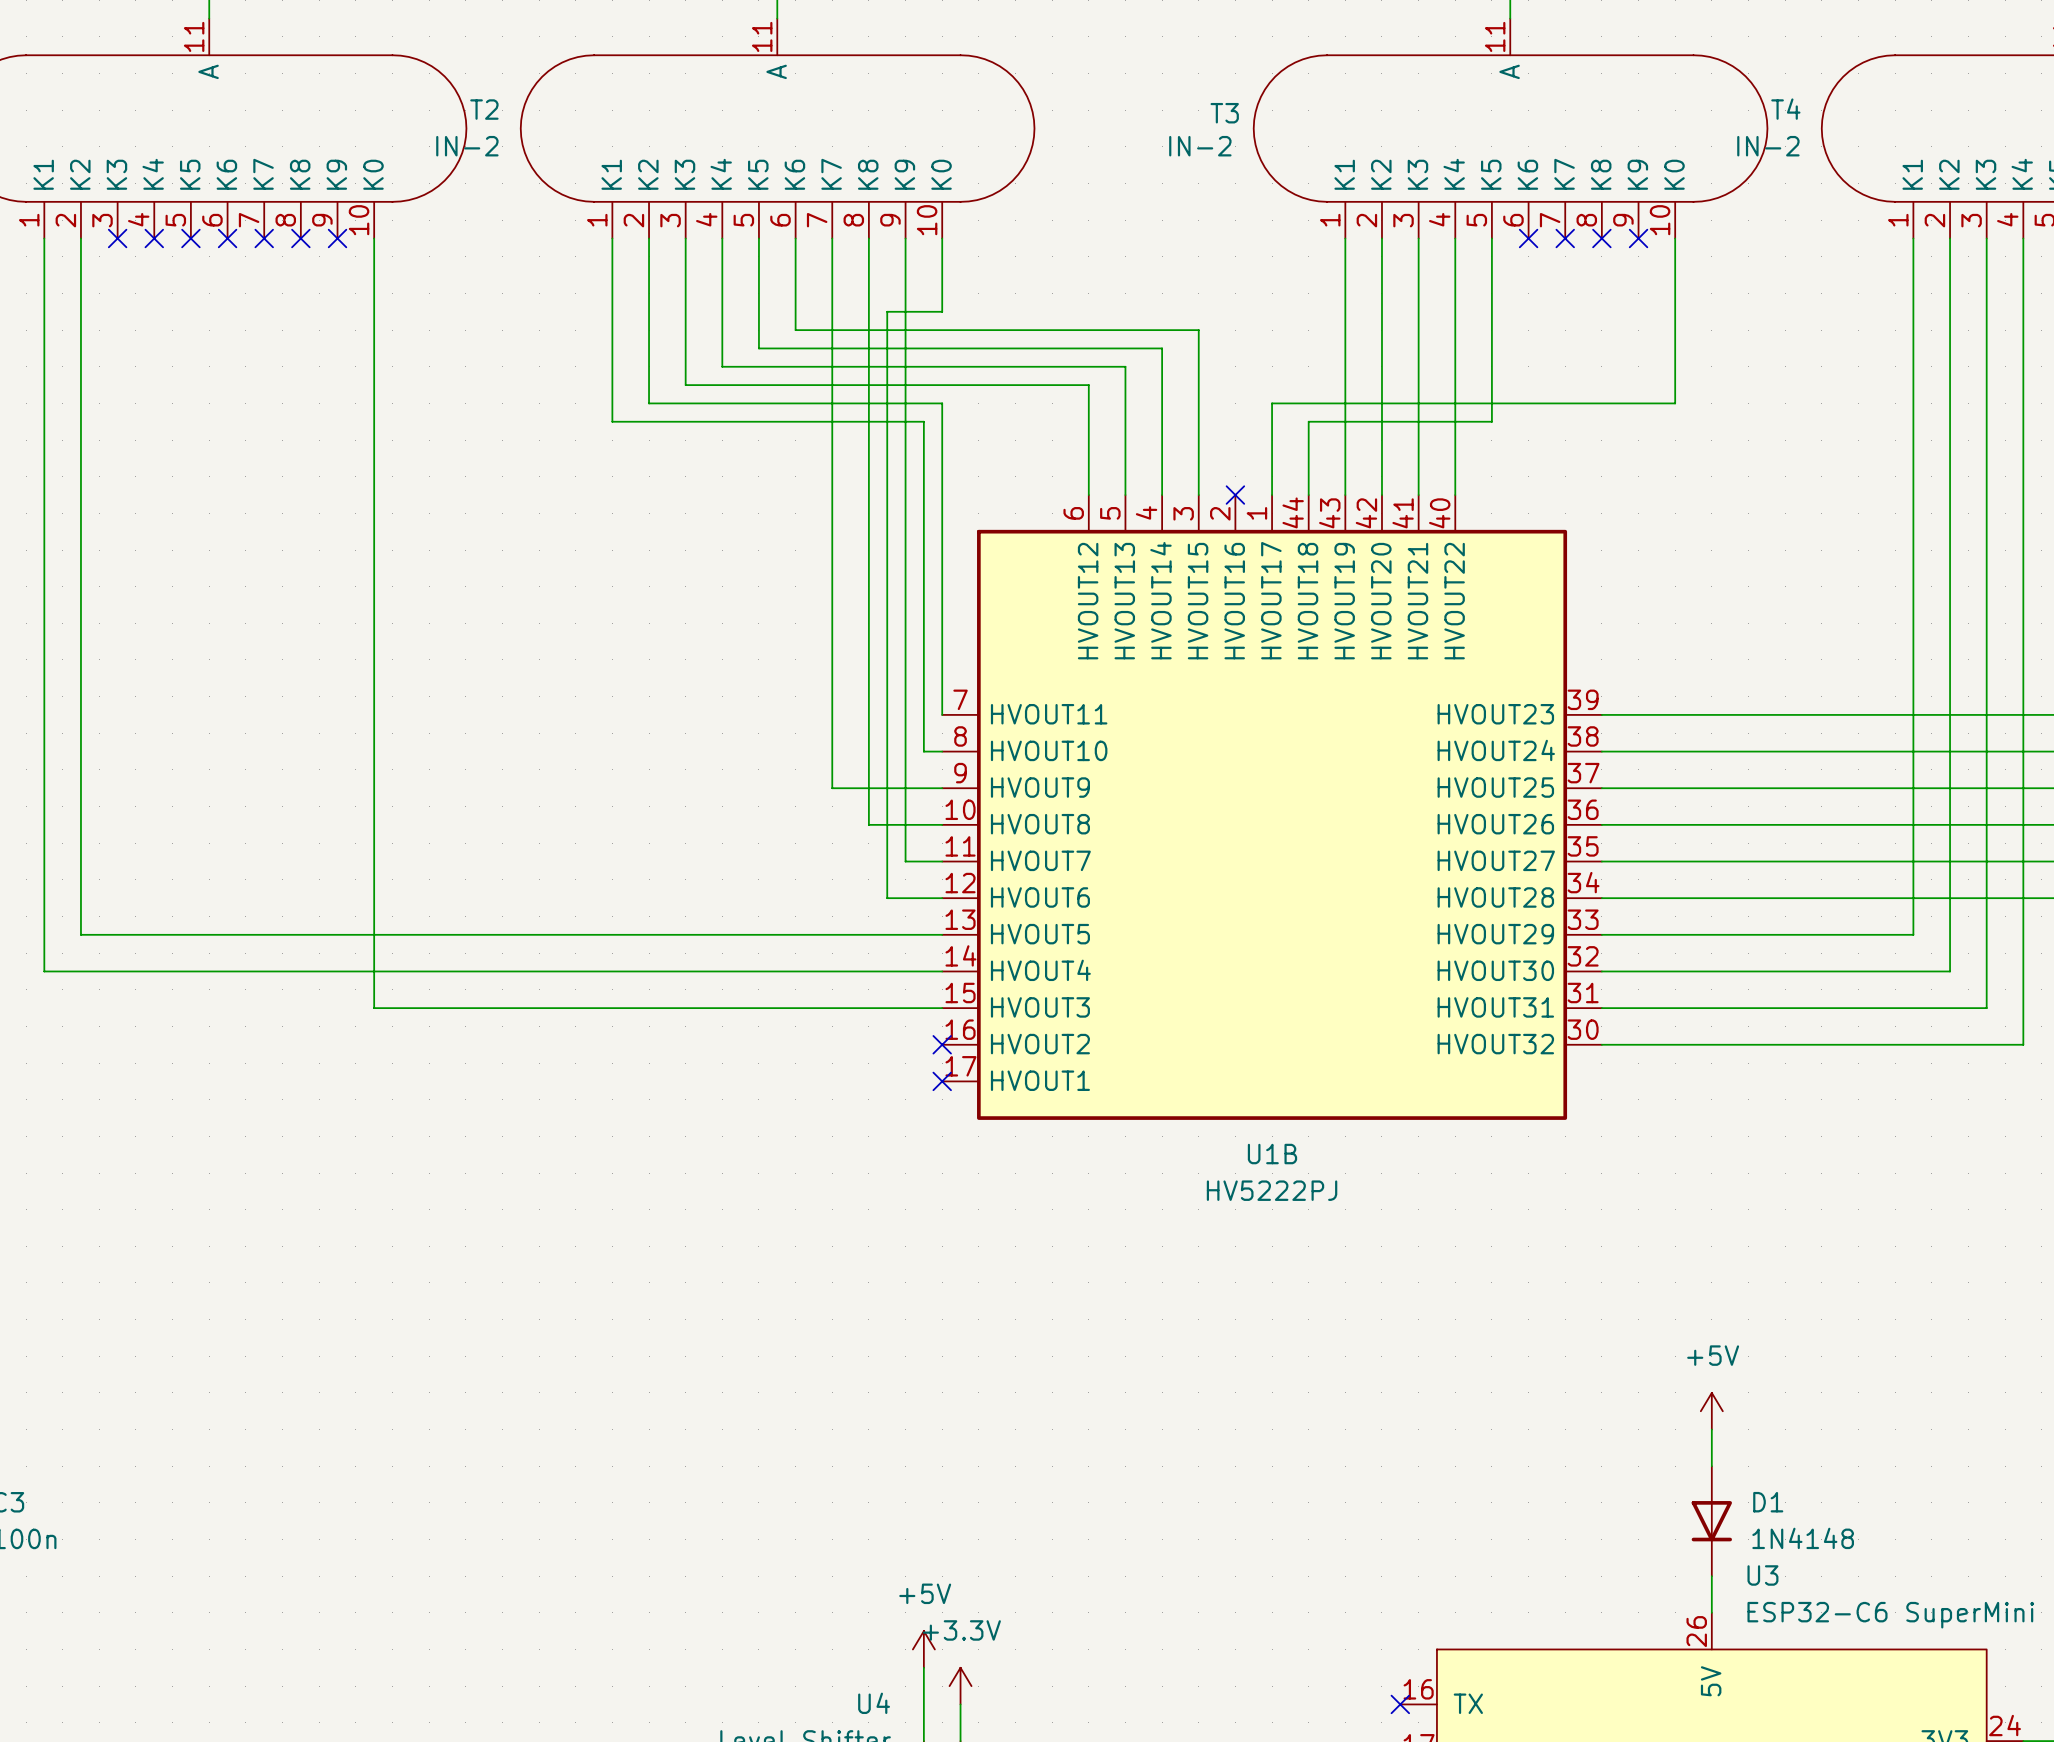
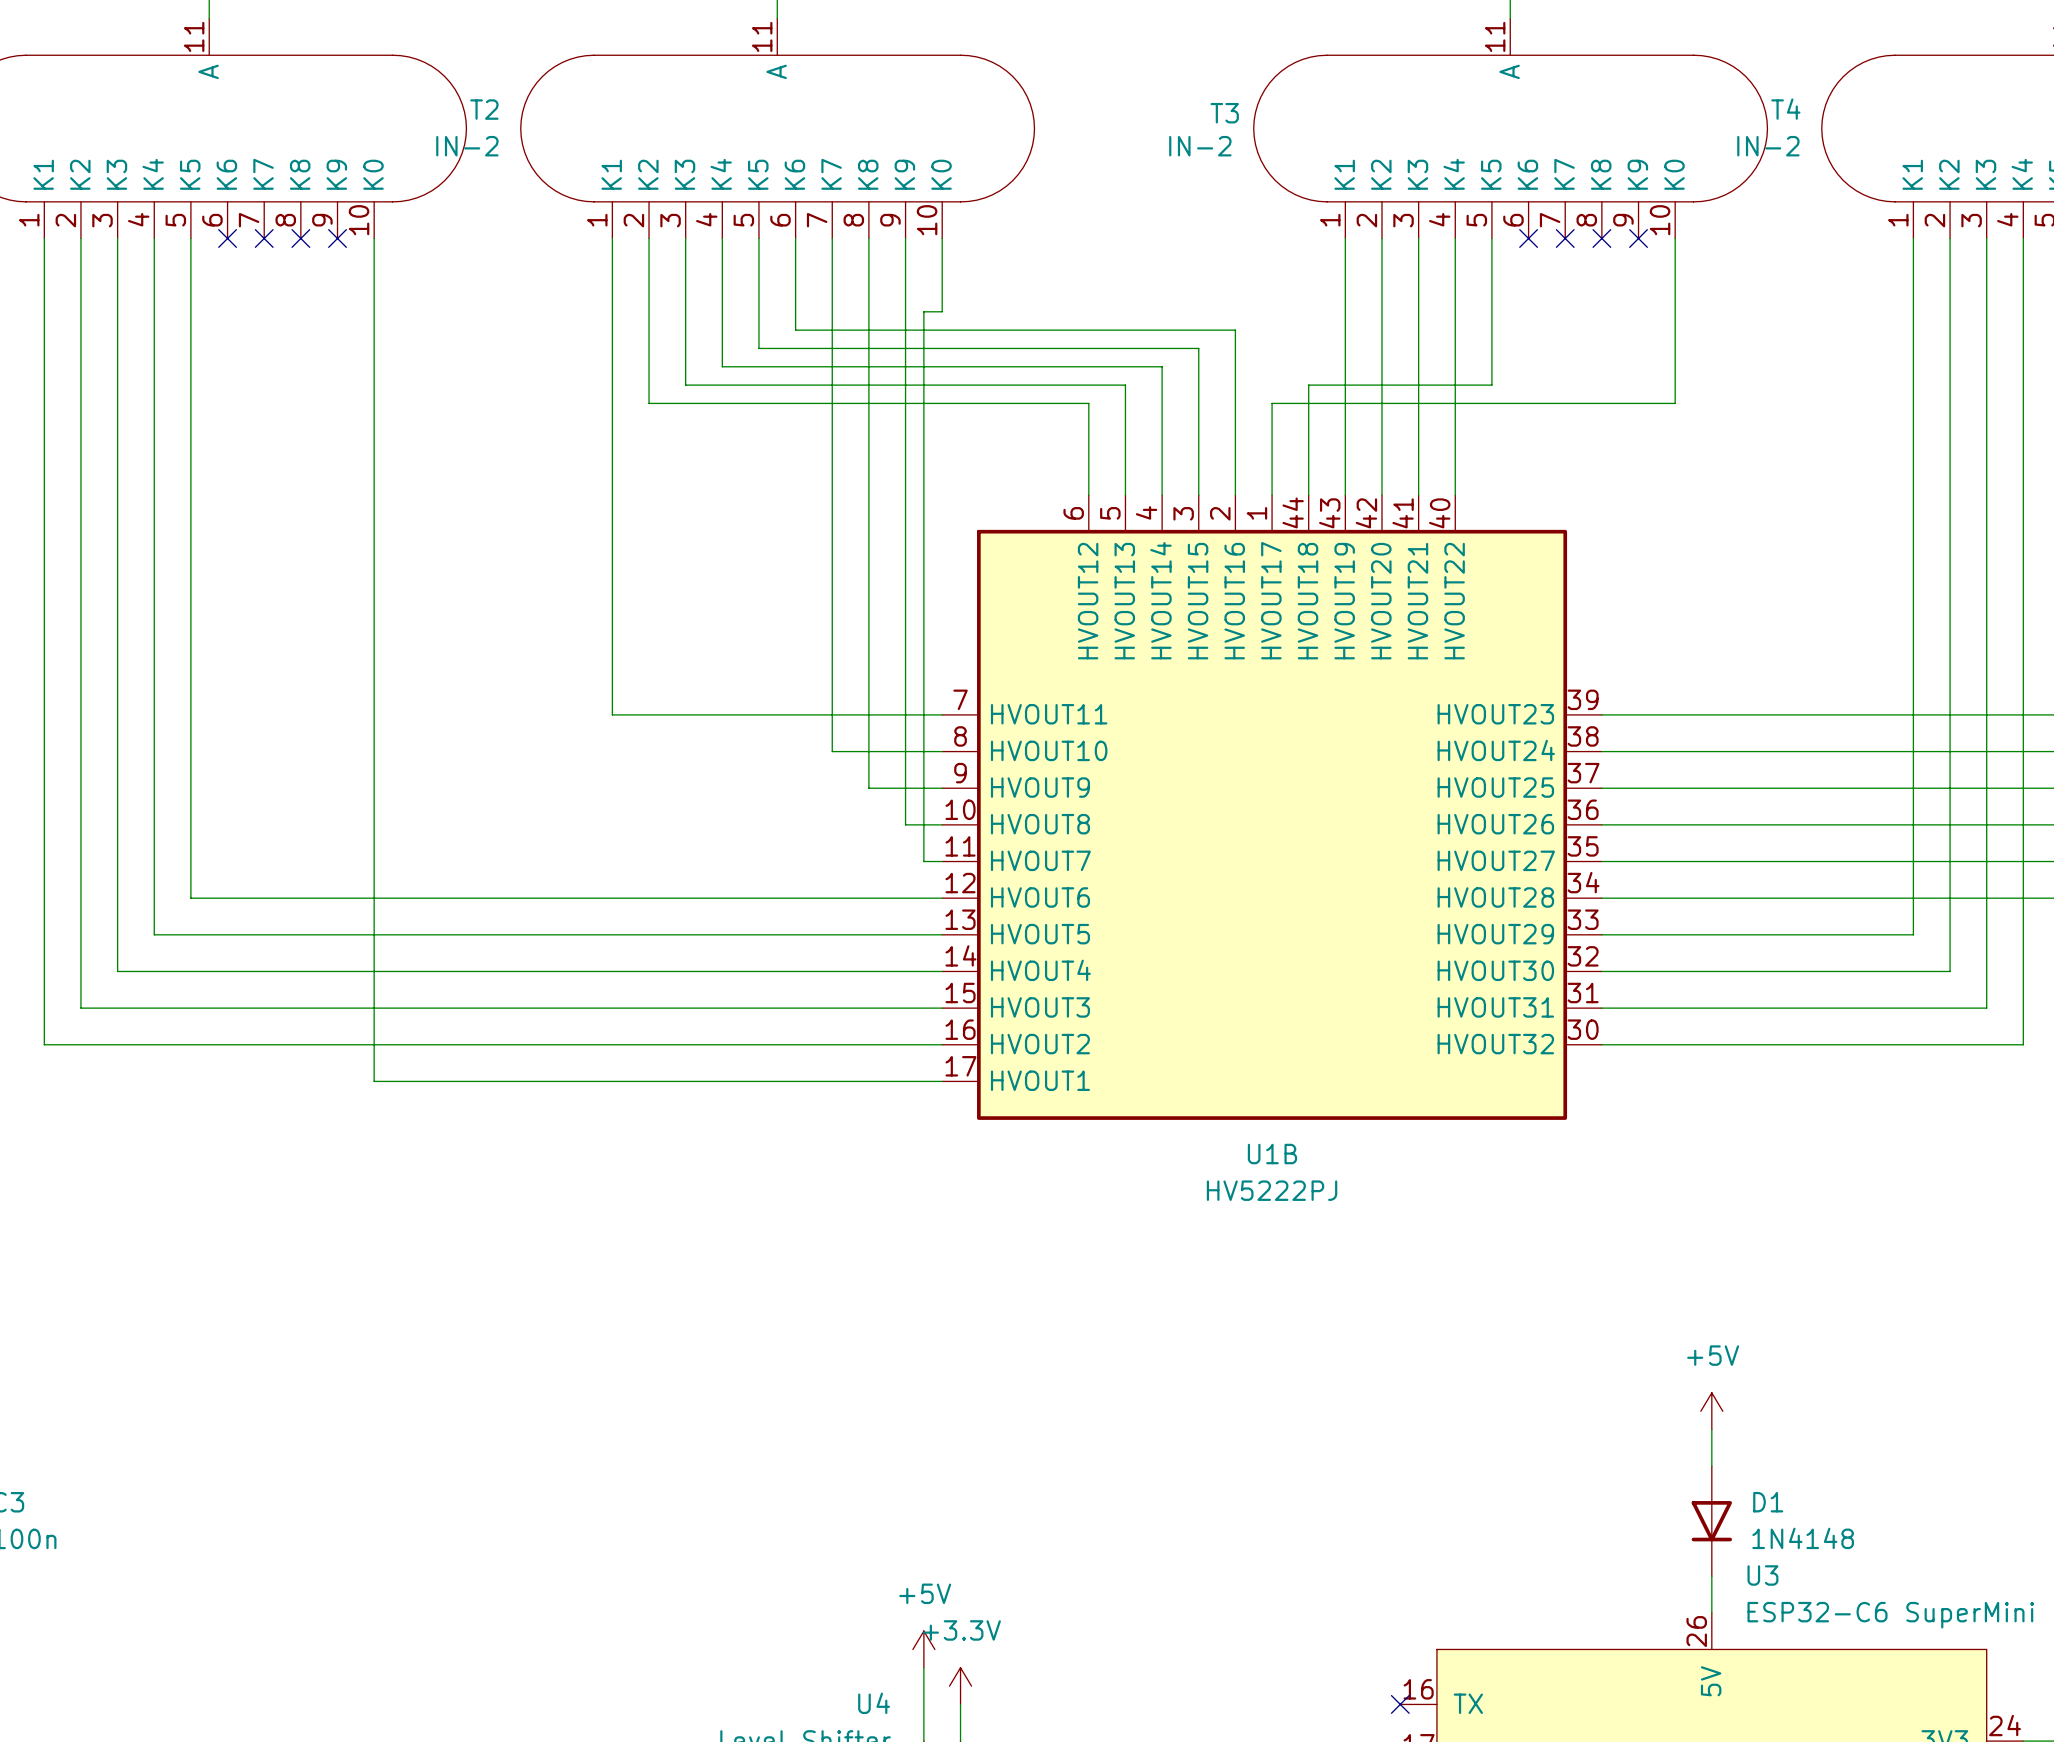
no-connect mark: (117, 238) -> none
no-connect mark: (154, 238) -> none
wire: none -> (190, 238) (190, 898) (887, 898)
no-connect mark: (190, 238) -> none
wire: (923, 311) (887, 311) (887, 898) -> (923, 311) (923, 421)
wire: (1198, 330) (1198, 348) -> (1162, 348) (1198, 348)
wire: none -> (1198, 330) (1235, 330) (1235, 495)
wire: (1162, 348) (1162, 366) -> none
wire: (1125, 366) (1125, 385) -> (1125, 366) (1162, 366)
wire: (1088, 385) (1088, 403) -> (1088, 385) (1125, 385)
wire: (1491, 385) (1491, 421) (1308, 421) -> (1491, 385) (1308, 385) (1308, 421)
wire: (942, 403) (942, 714) -> (942, 403) (1088, 403)
wire: (612, 421) (923, 421) -> (612, 421) (612, 714) (942, 714)
no-connect mark: (1235, 495) -> none
wire: (832, 751) (832, 788) (868, 788) (868, 824) (905, 824) (905, 861) (923, 861) -> (832, 751) (923, 751) (923, 861)
wire: (80, 934) (154, 934) -> (154, 238) (154, 934)
wire: none -> (80, 934) (80, 1008) (374, 1008) (374, 1081) (942, 1081)
wire: (44, 971) (117, 971) -> (117, 238) (117, 971)
wire: none -> (44, 971) (44, 1044) (942, 1044)
no-connect mark: (942, 1044) -> none
no-connect mark: (942, 1081) -> none

